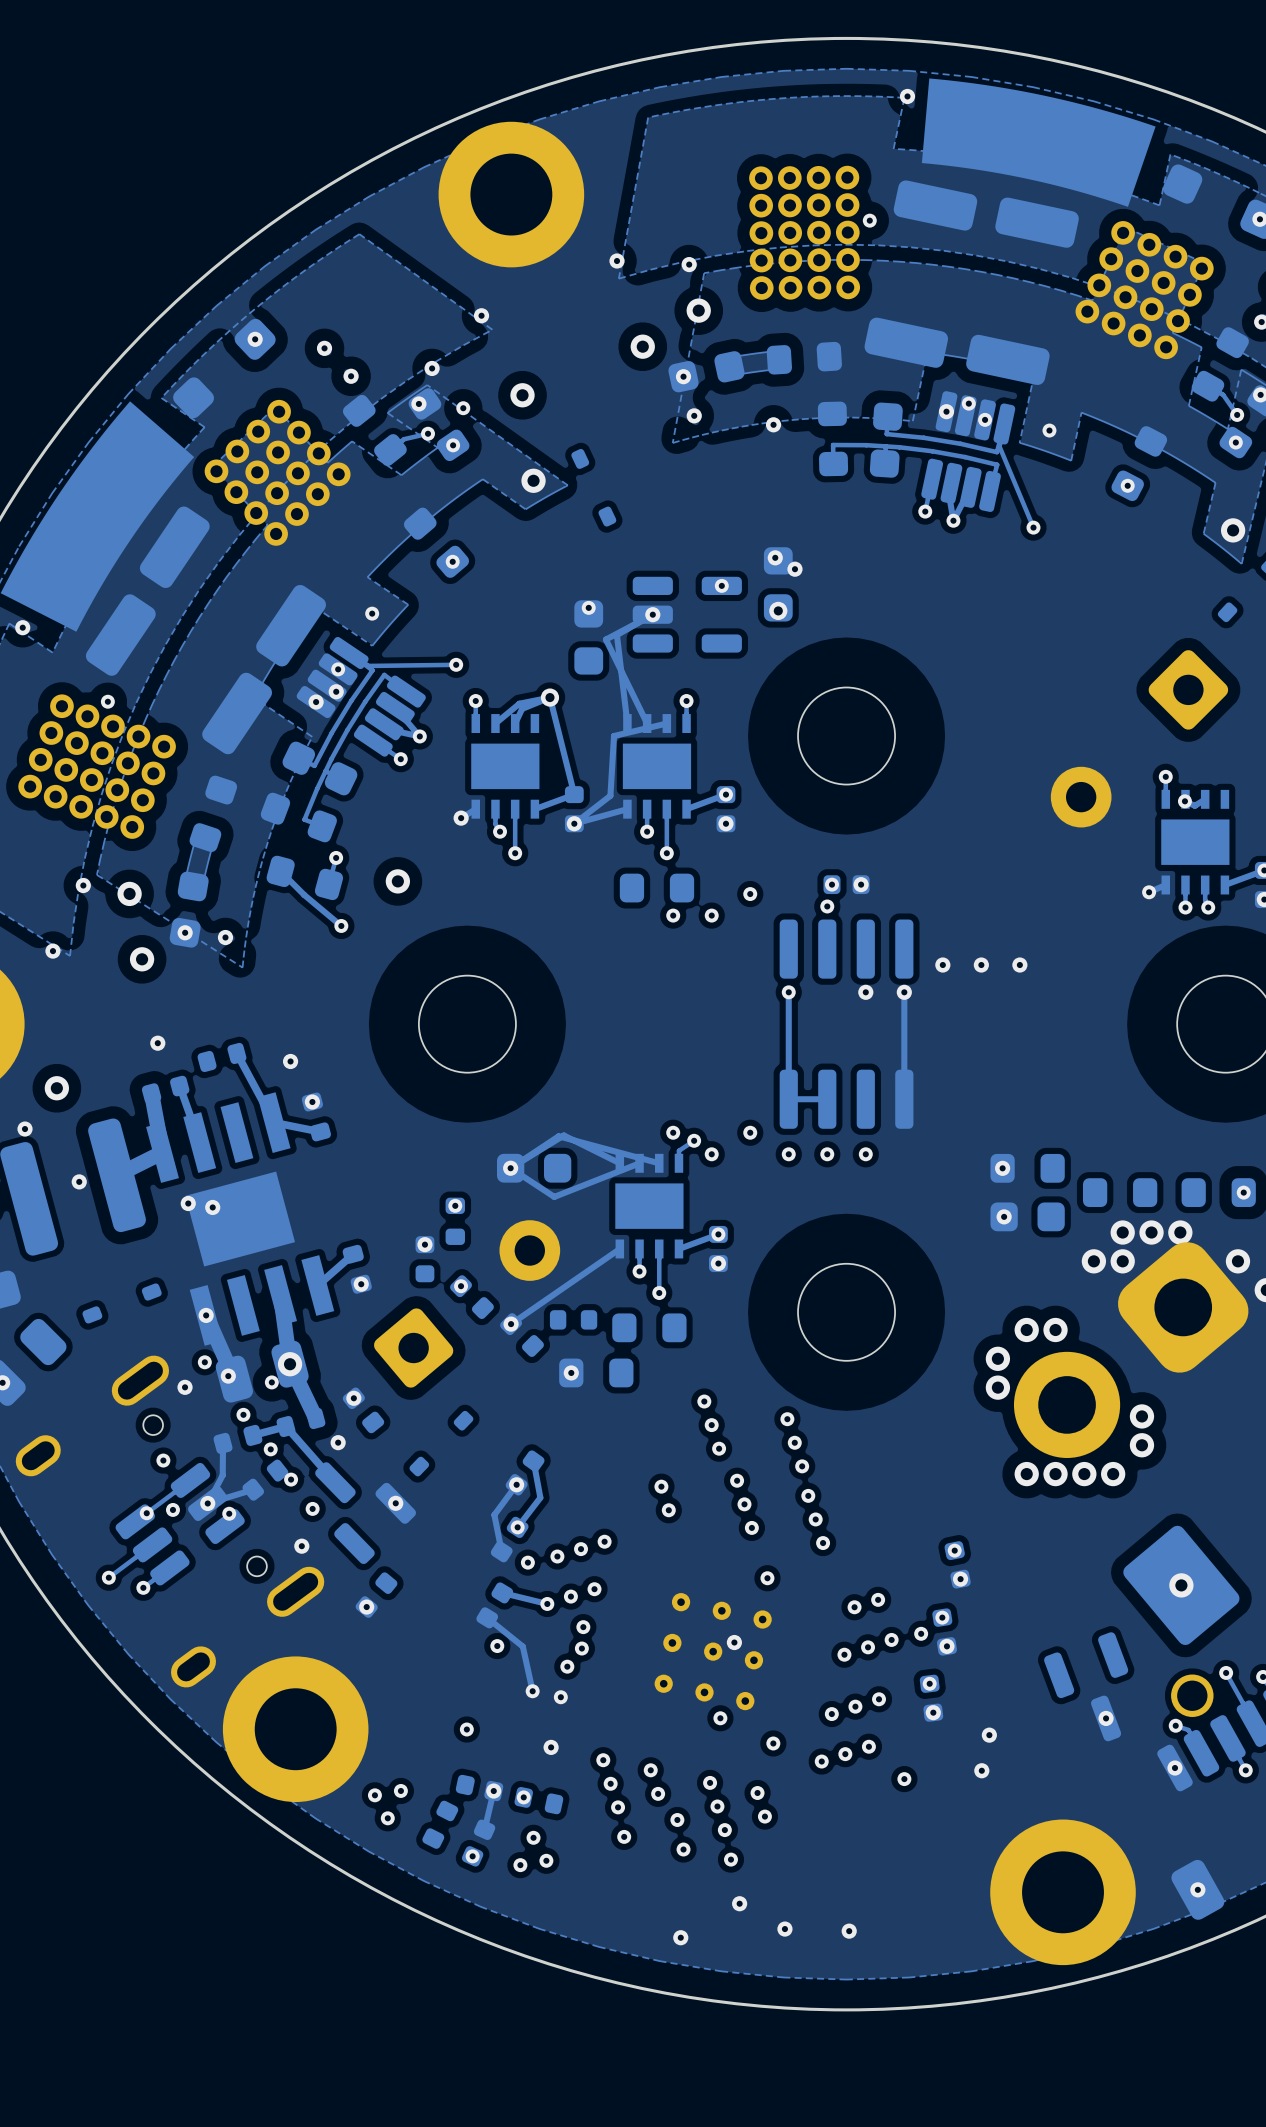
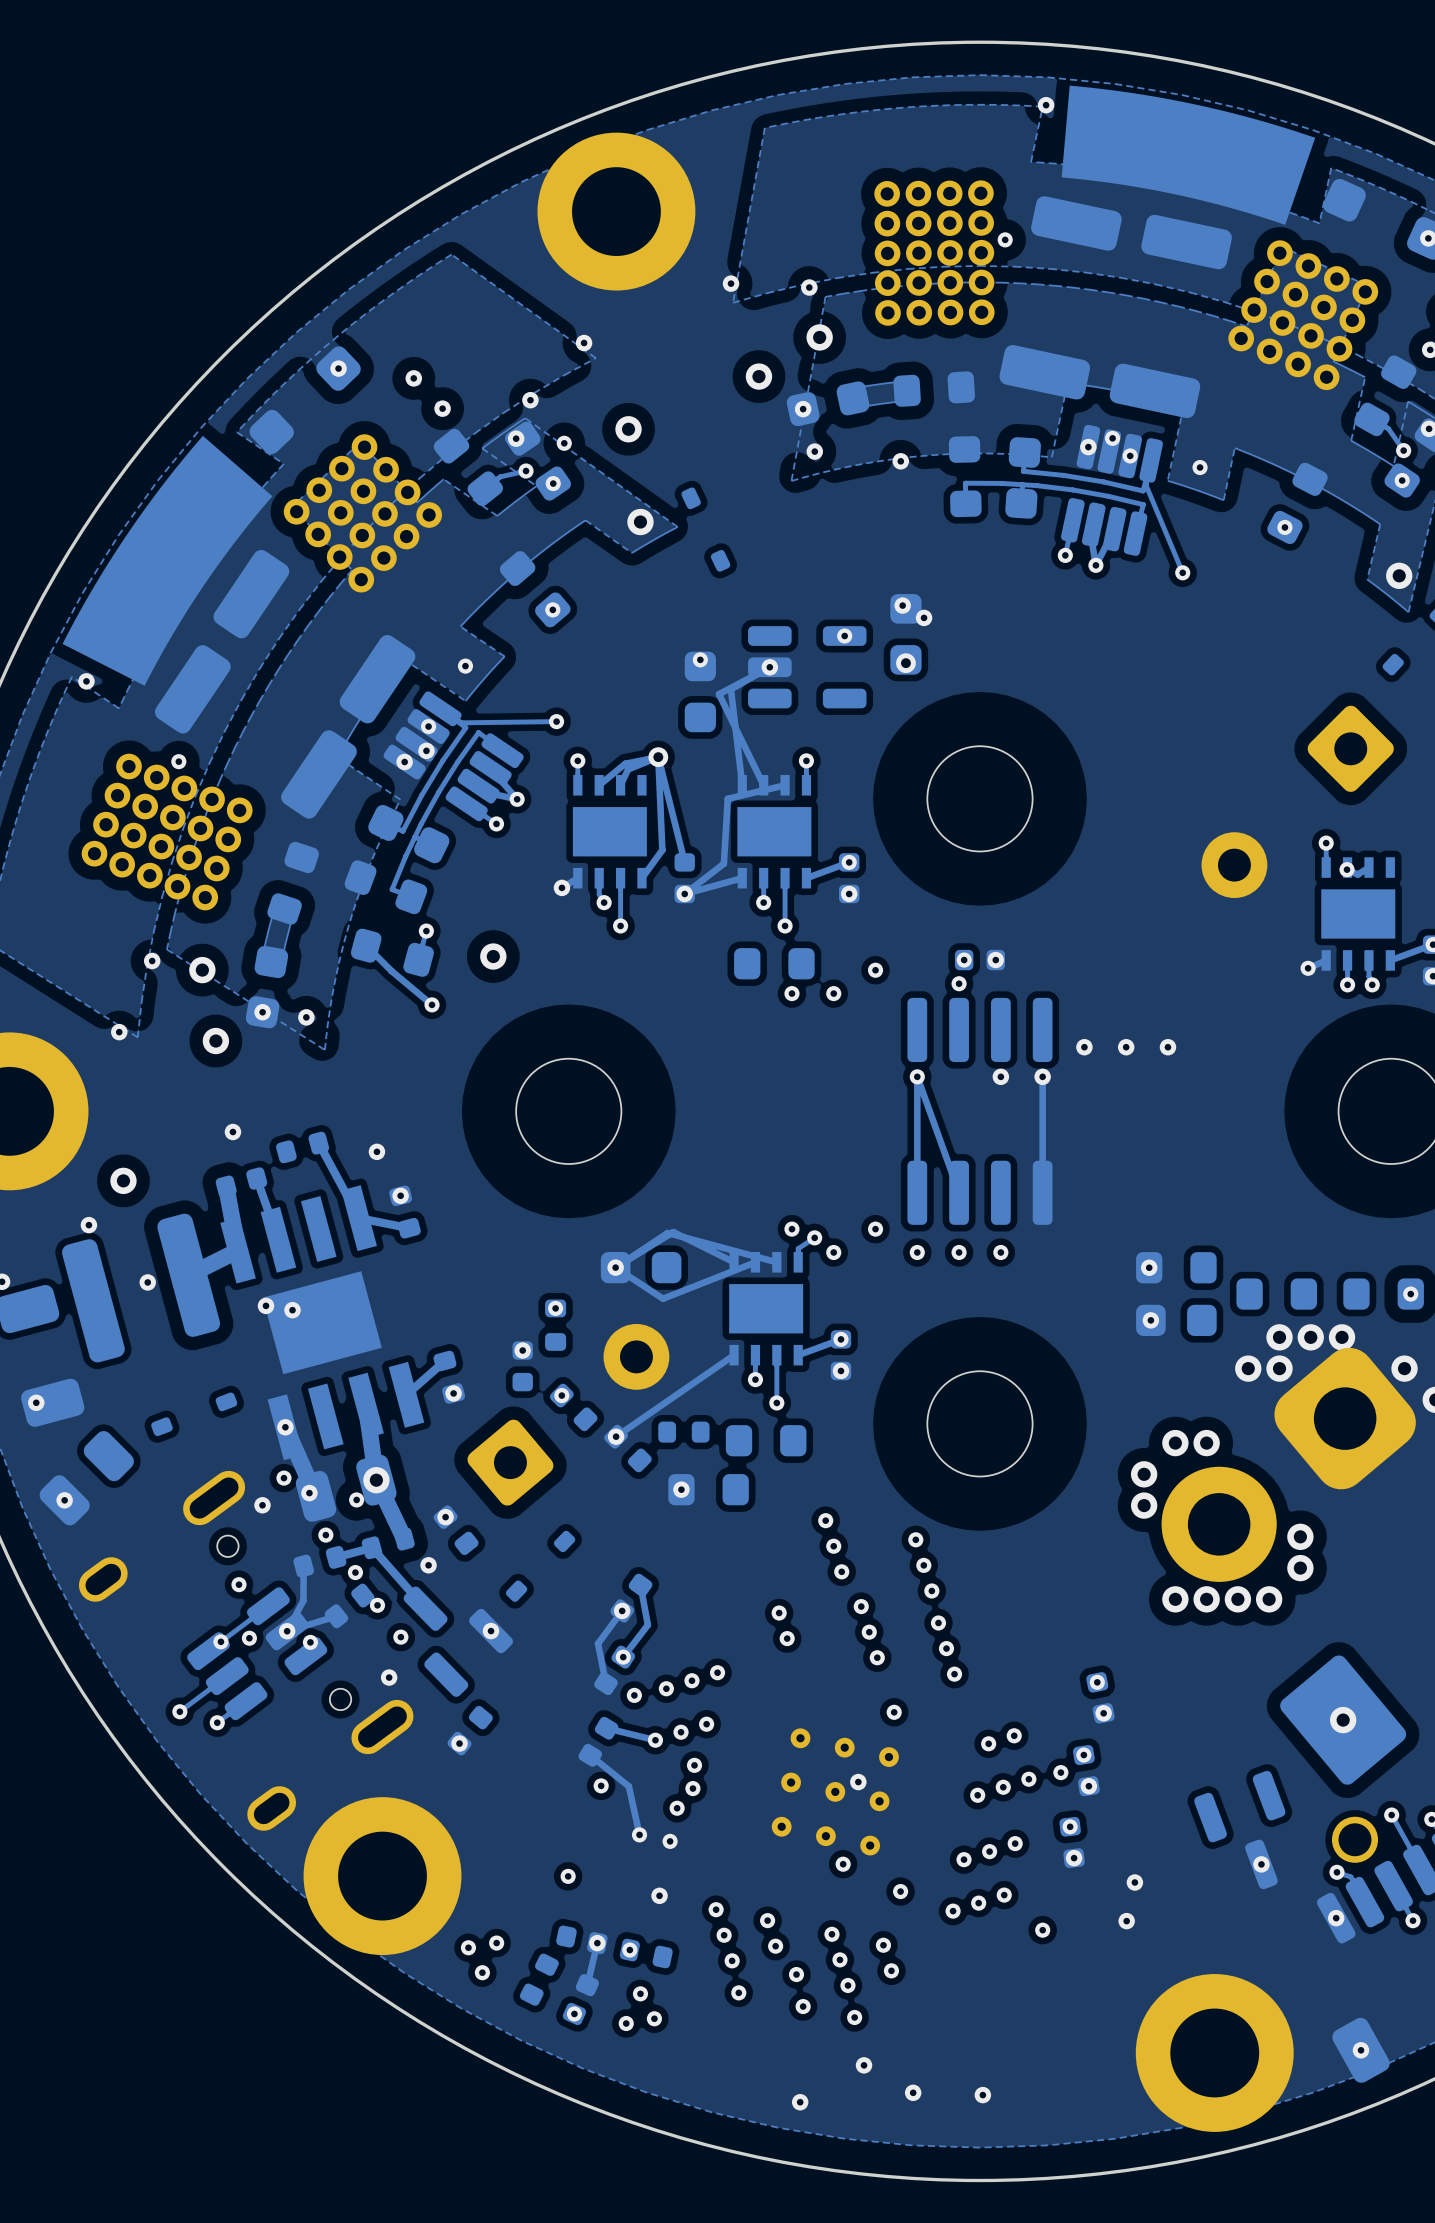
track: (574, 794) (534, 809) -> (658, 757) (662, 850) (641, 878)
track: (827, 1099) (788, 1099) -> (959, 1192) (917, 1076)

